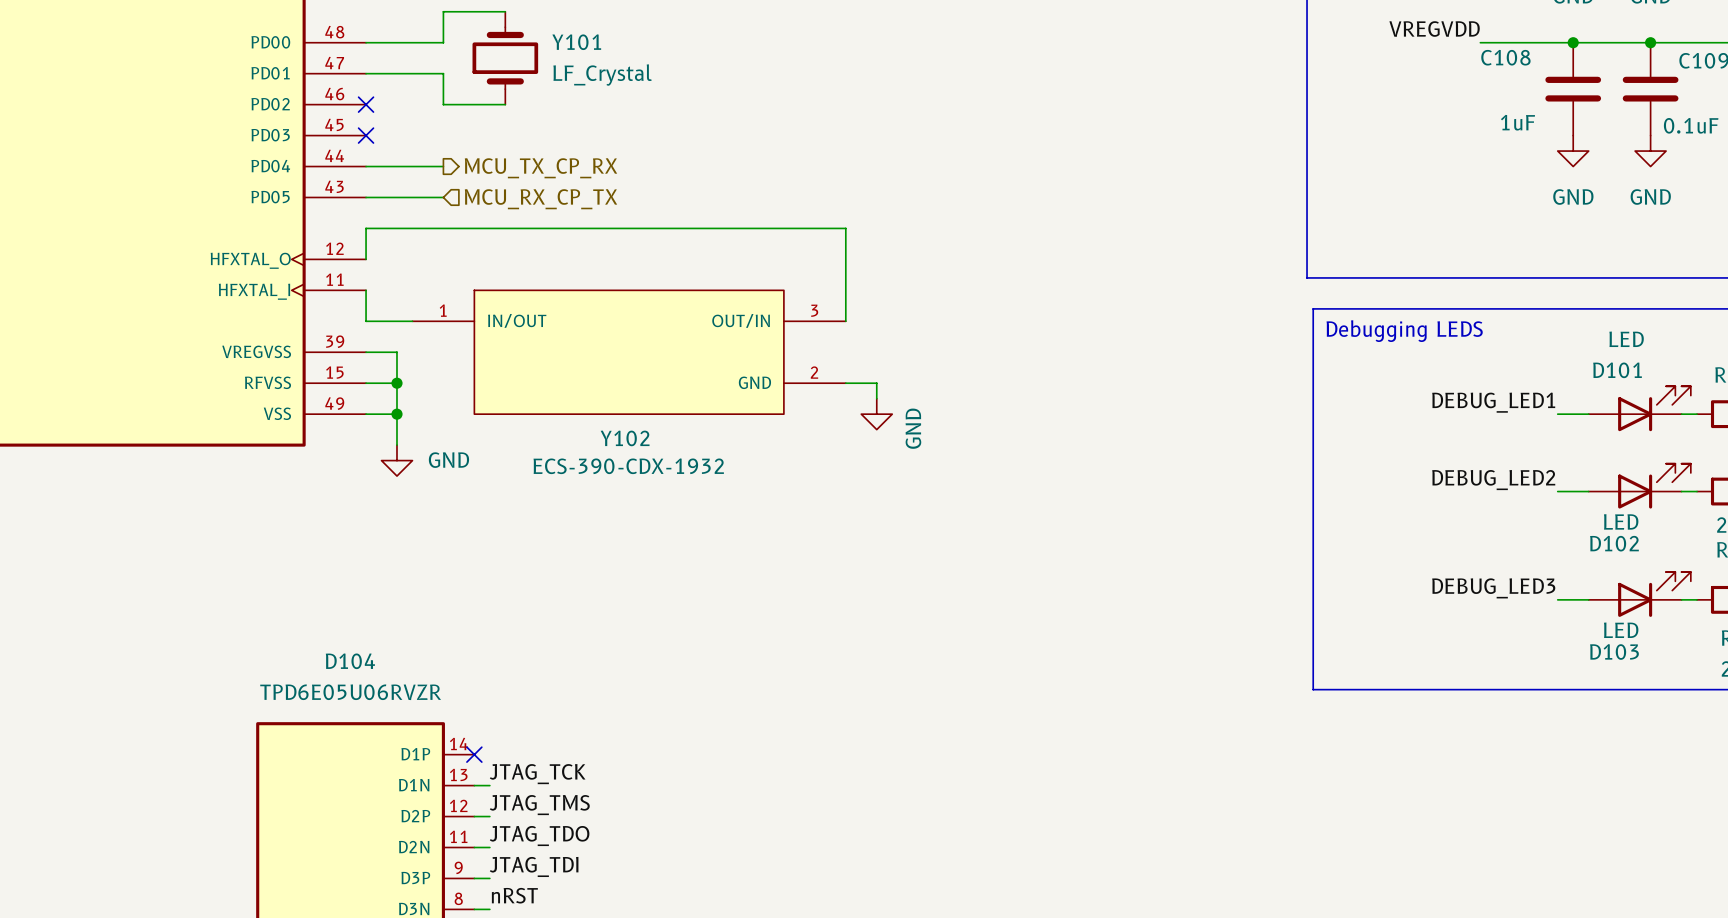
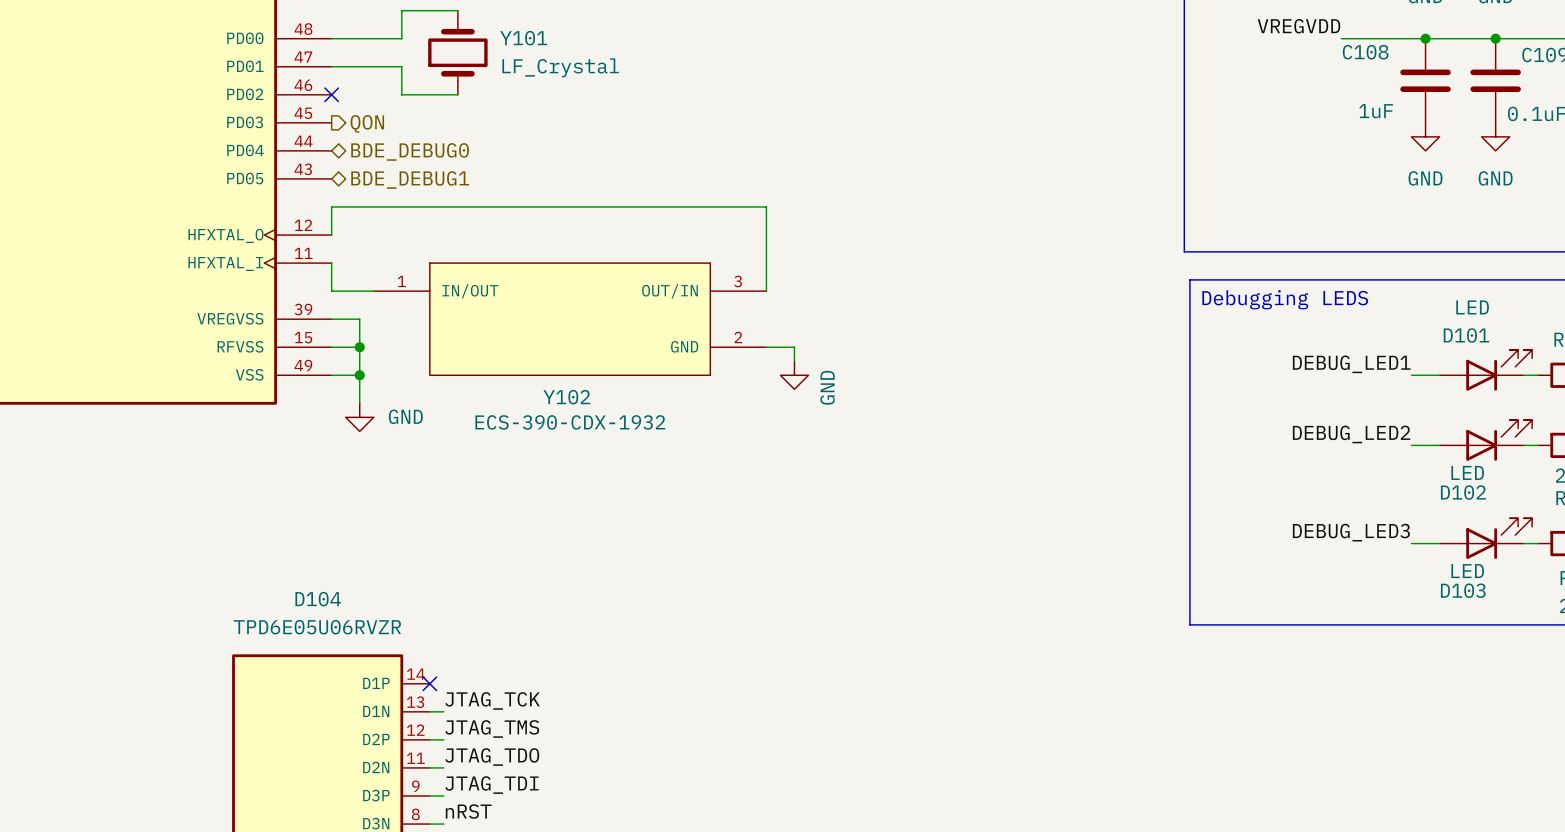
no-connect mark: (366, 135) -> none
hierarchical label: none -> QON (367, 123)
wire: (366, 166) (443, 166) -> none
hierarchical label: none -> BDE_DEBUG0 (410, 151)
hierarchical label: MCU_TX_CP_RX (541, 168) -> none
wire: (366, 197) (443, 197) -> none
hierarchical label: none -> BDE_DEBUG1 (410, 180)
hierarchical label: MCU_RX_CP_TX (541, 199) -> none

